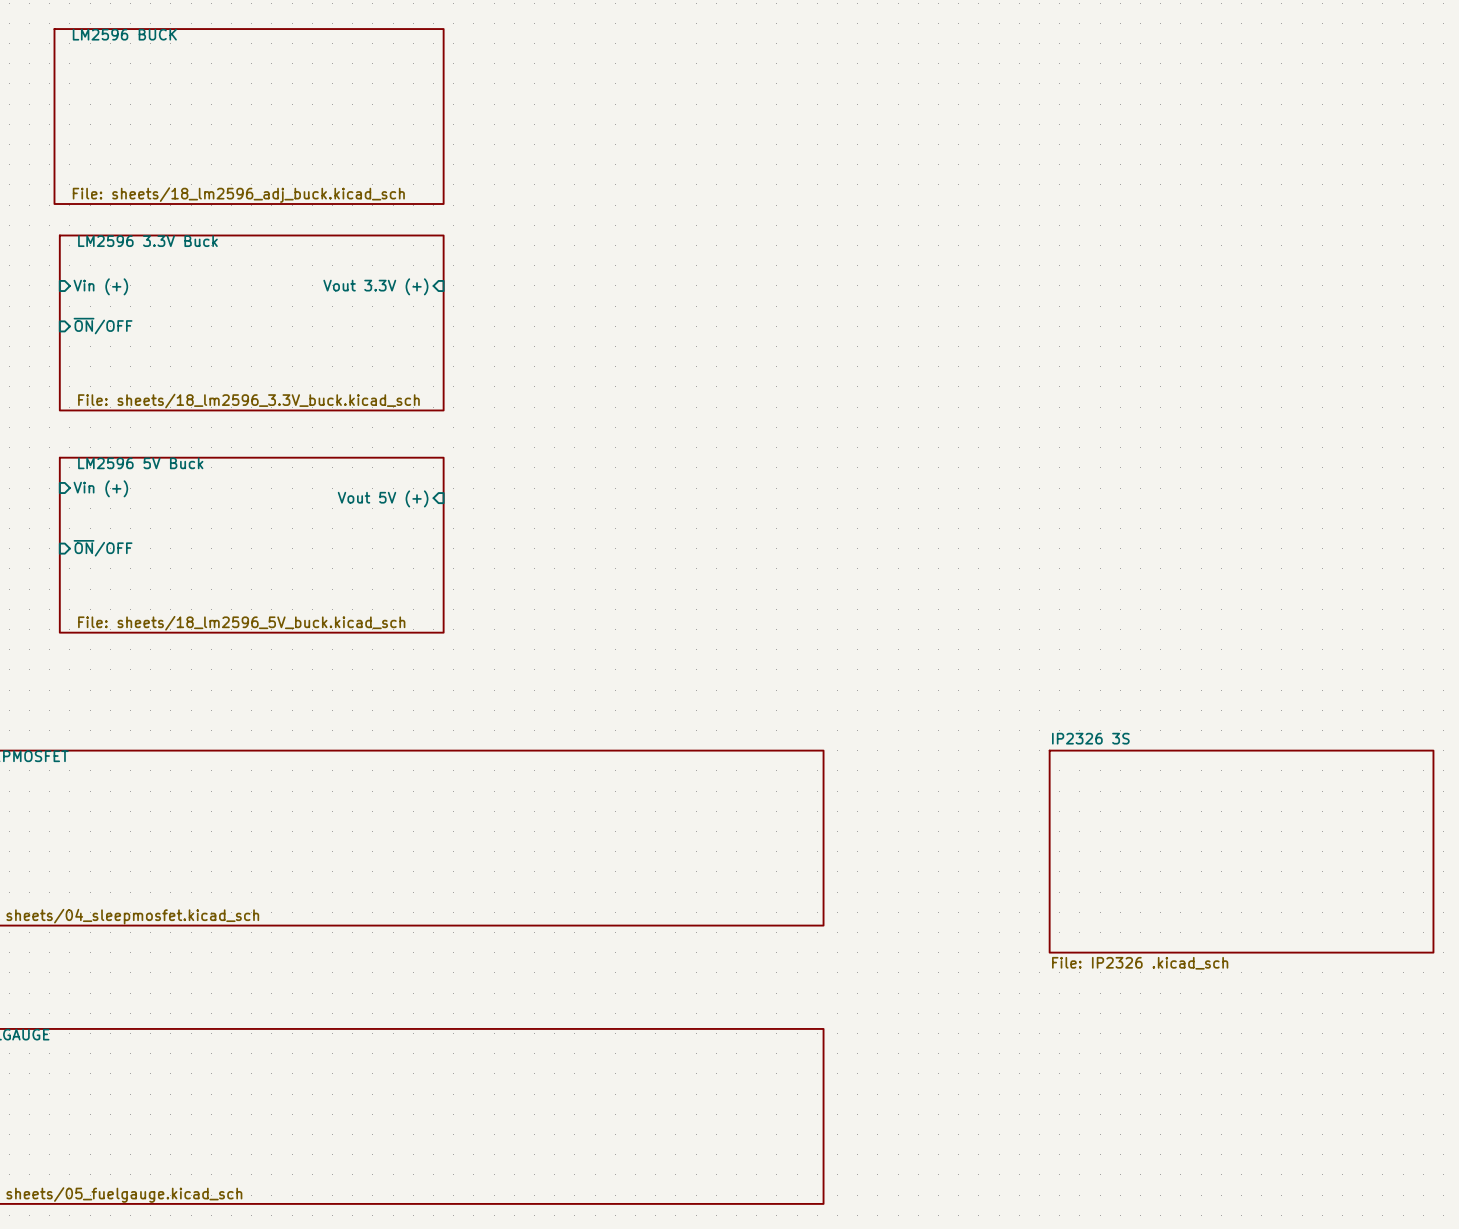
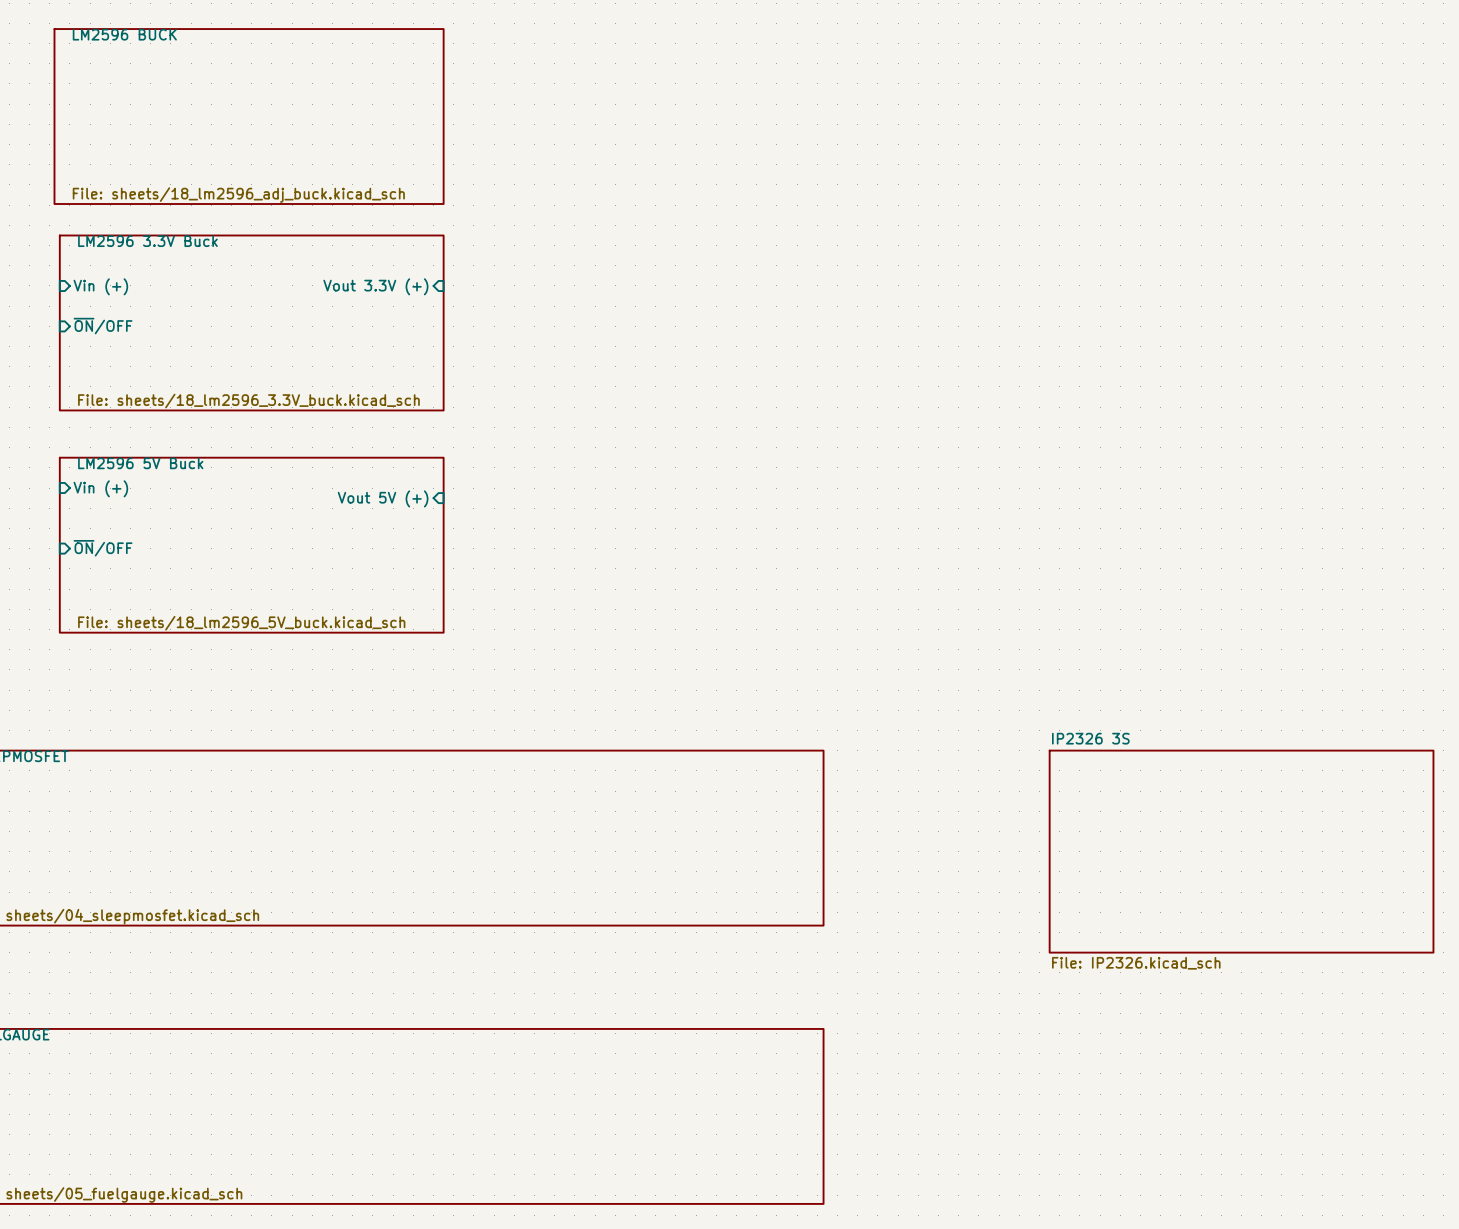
sheet IP2326 3S value: File: IP2326 .kicad_sch (1140, 963) -> File: IP2326.kicad_sch (1136, 963)

